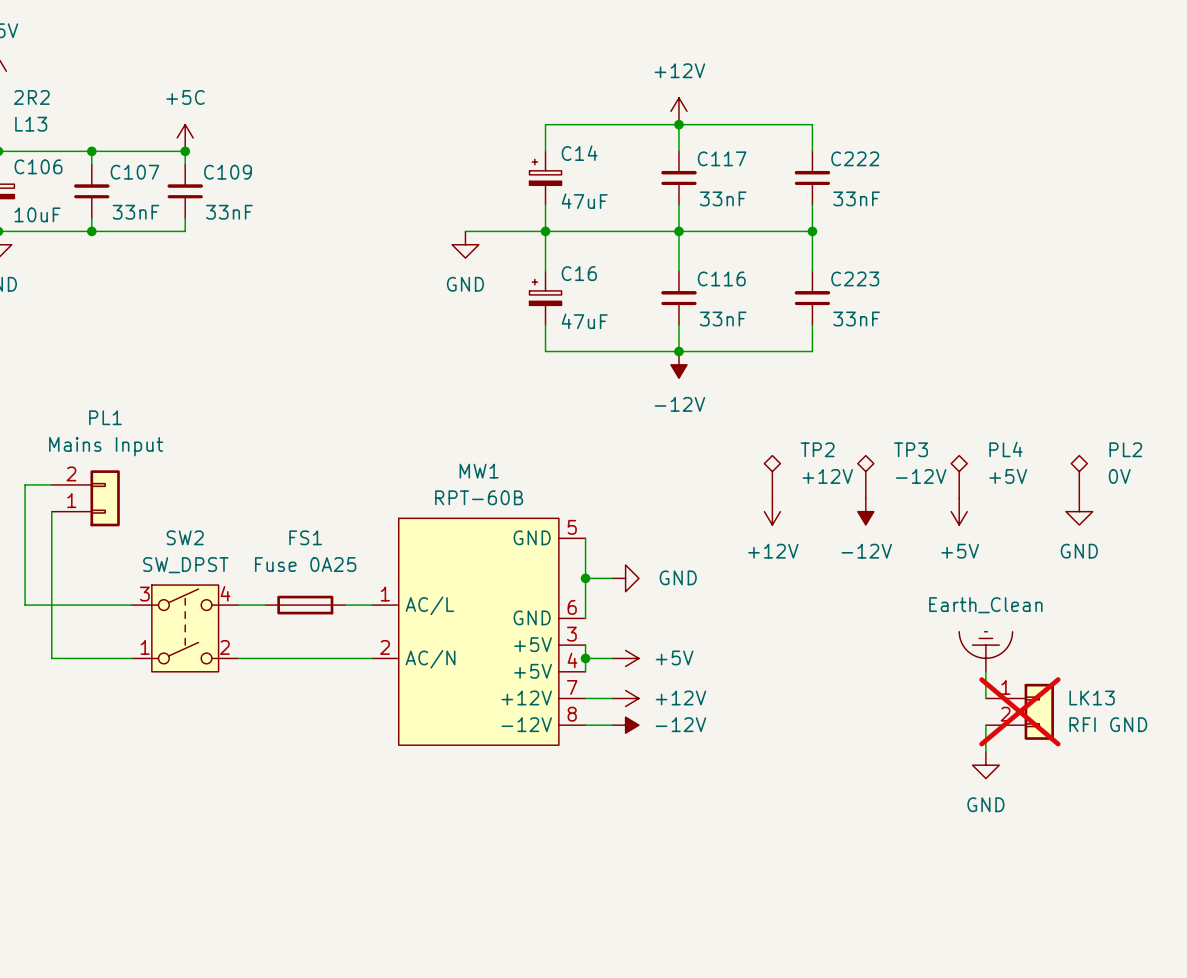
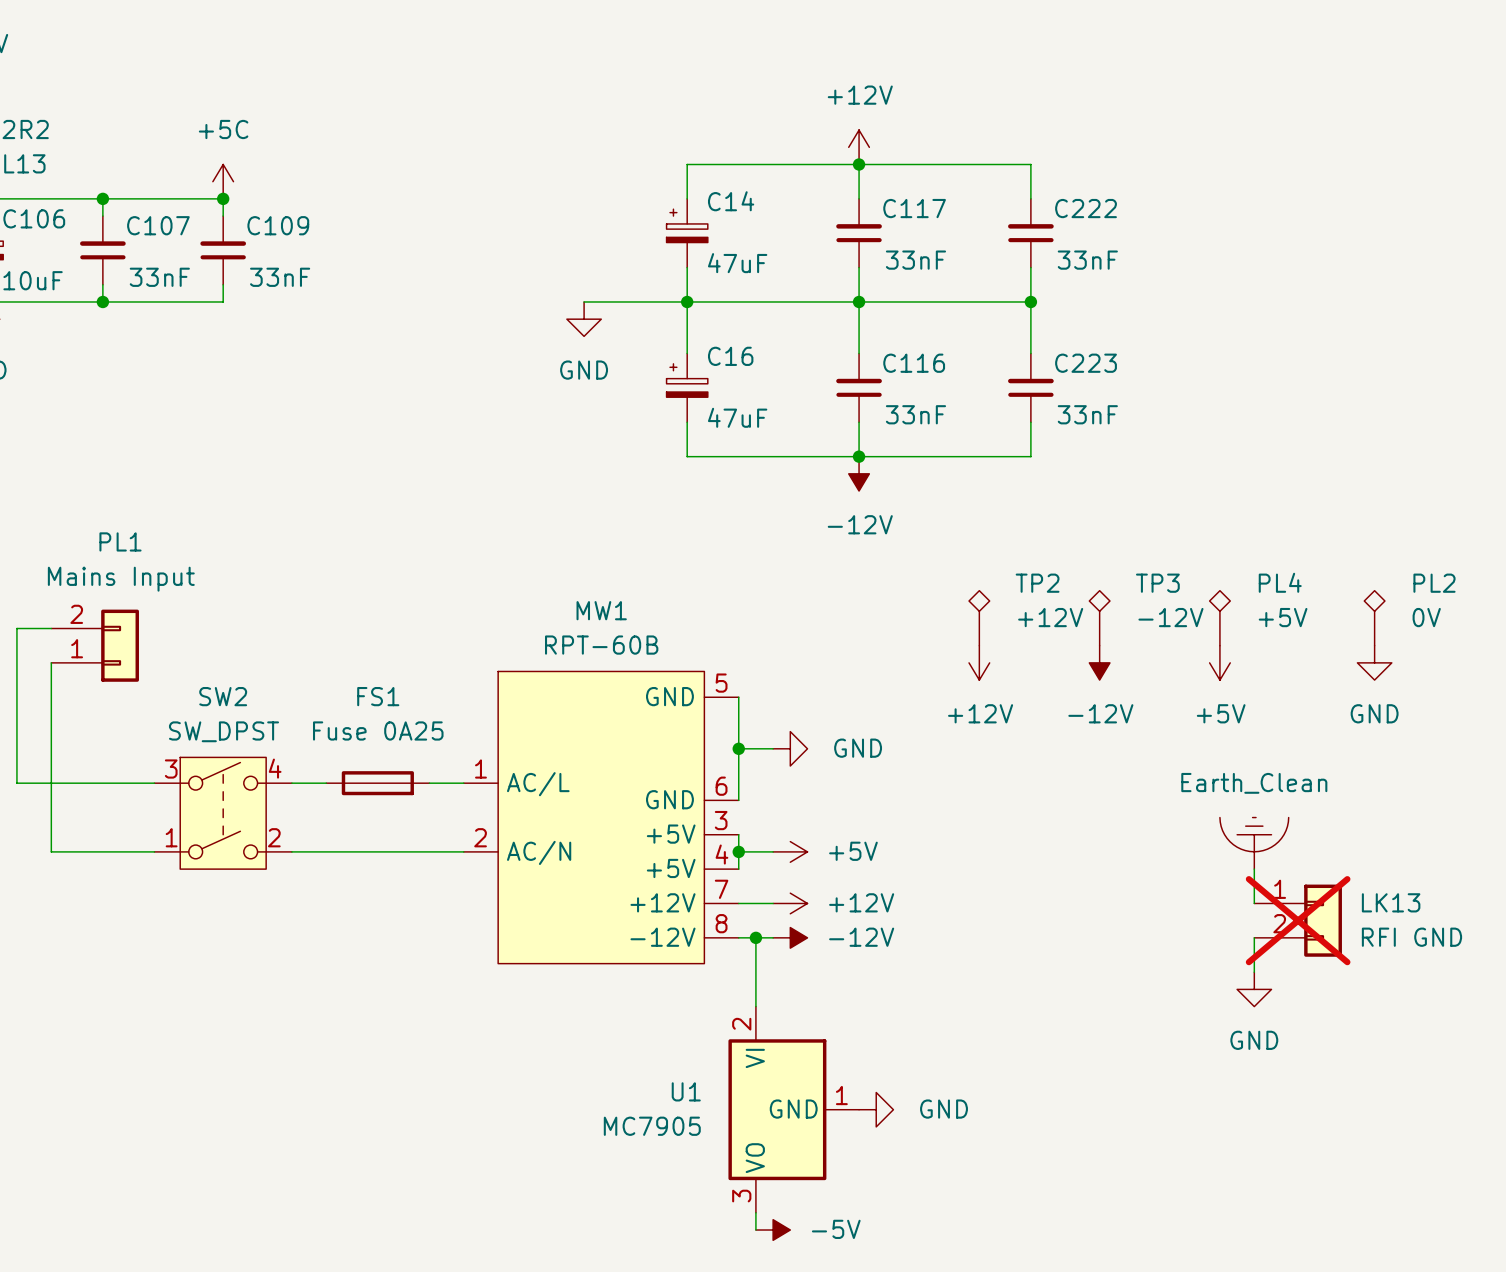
wire: none -> (755, 937) (755, 1006)
junction: none -> (755, 937)
U1: none -> MC7905 (793, 1109)
power symbol: none -> GND (876, 1109)
wire: none -> (755, 1212) (755, 1230)
power symbol: none -> -5V (773, 1230)

